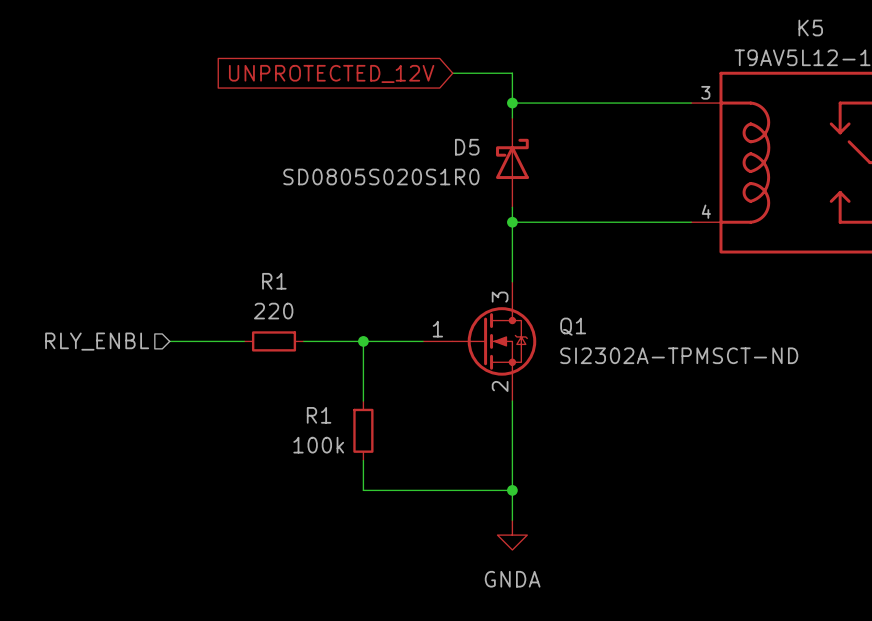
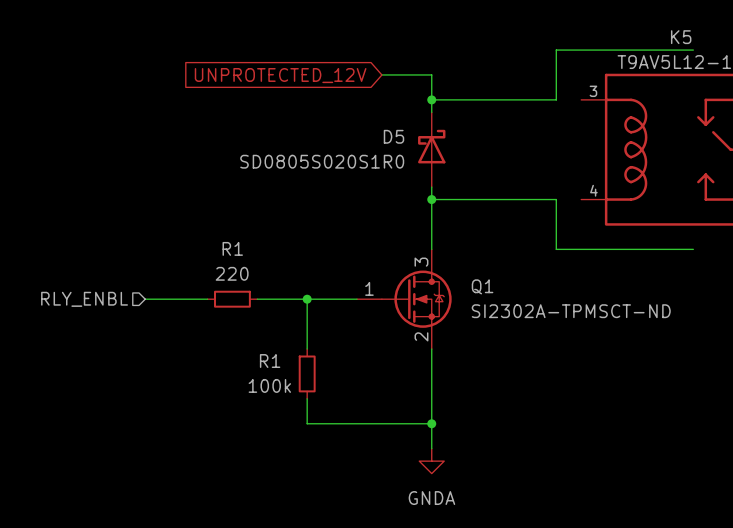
wire: (661, 103) (691, 103) -> (556, 99) (556, 50) (693, 50)
wire: (661, 222) (691, 222) -> (556, 199) (556, 249) (693, 249)

